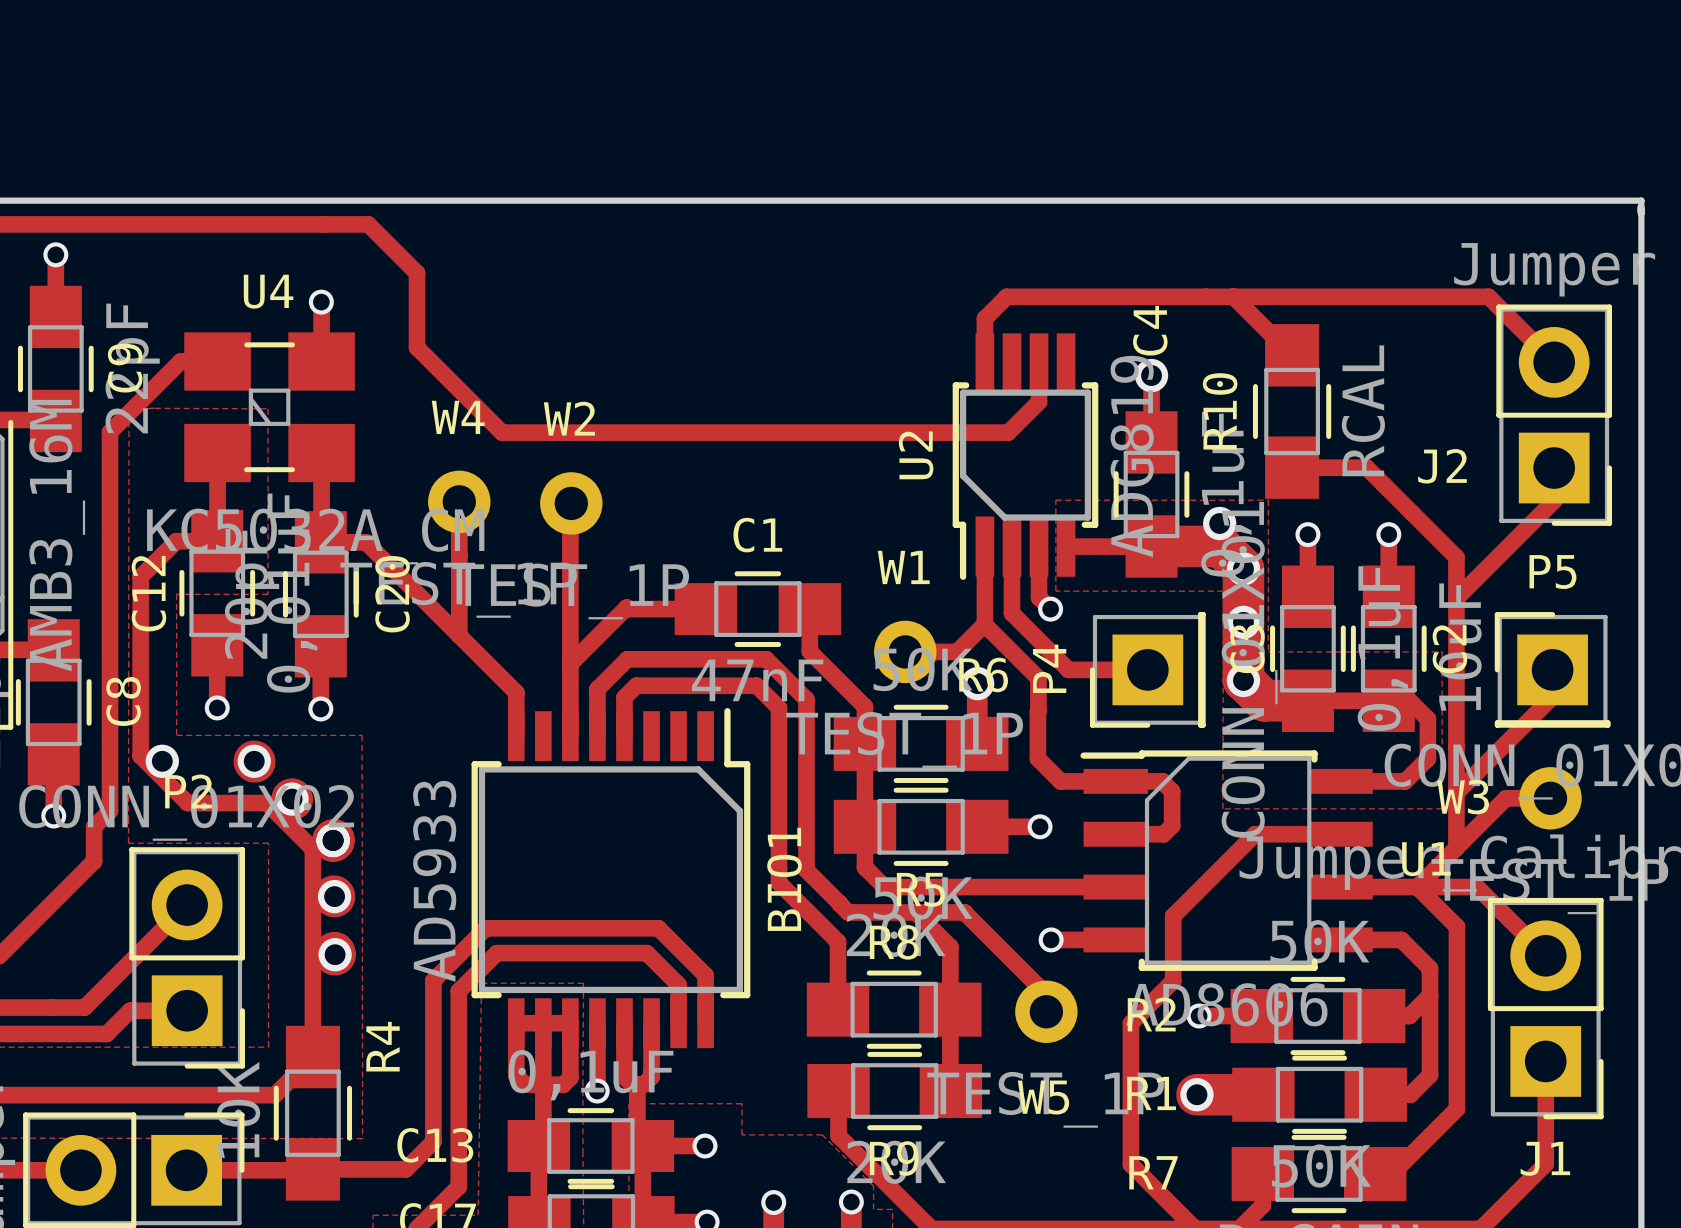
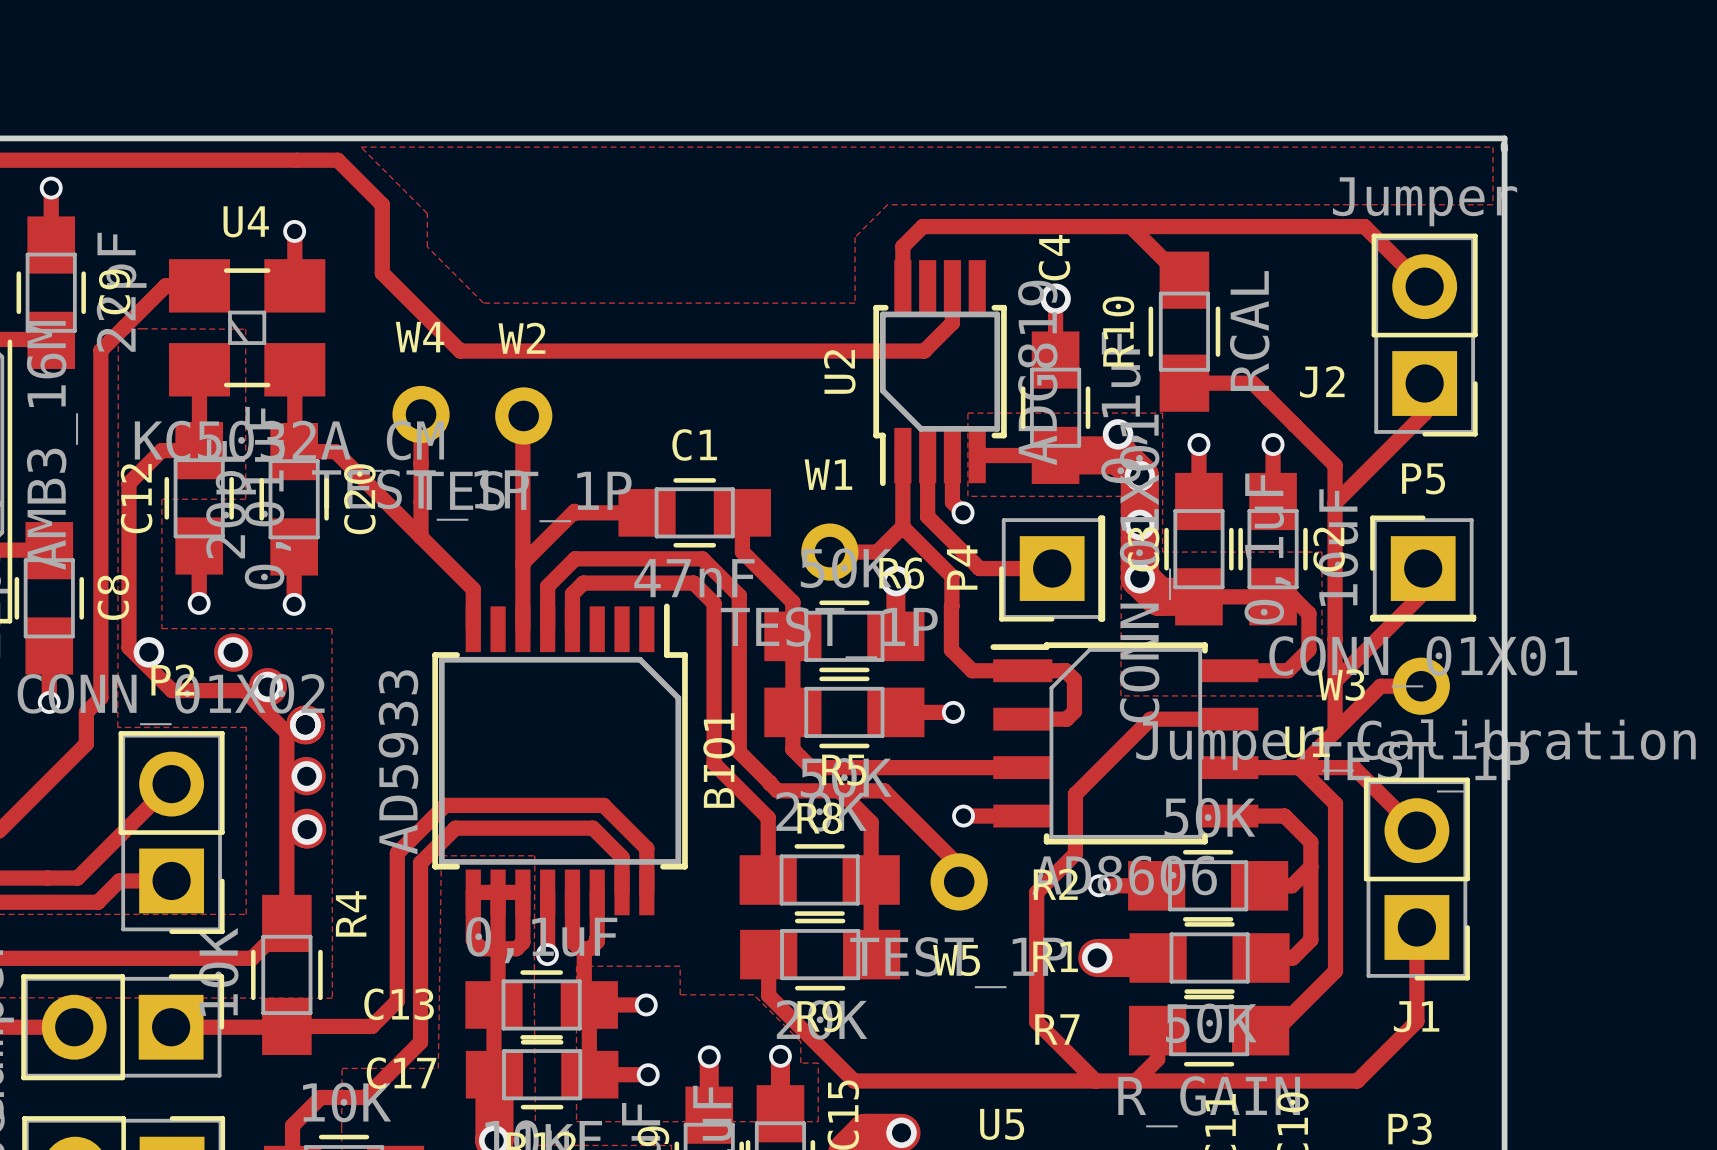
zone outline: none -> (360, 147) (427, 213) (427, 246) (483, 303) (855, 303) (855, 237) (887, 204) (1492, 204) (1492, 147) (360, 147)

